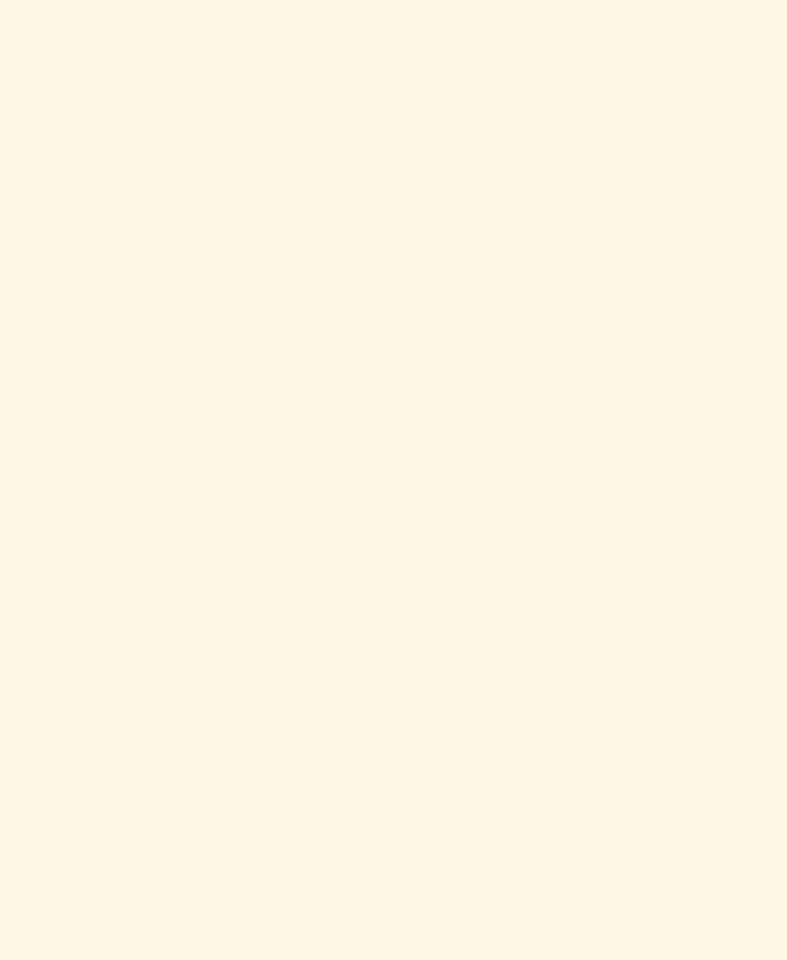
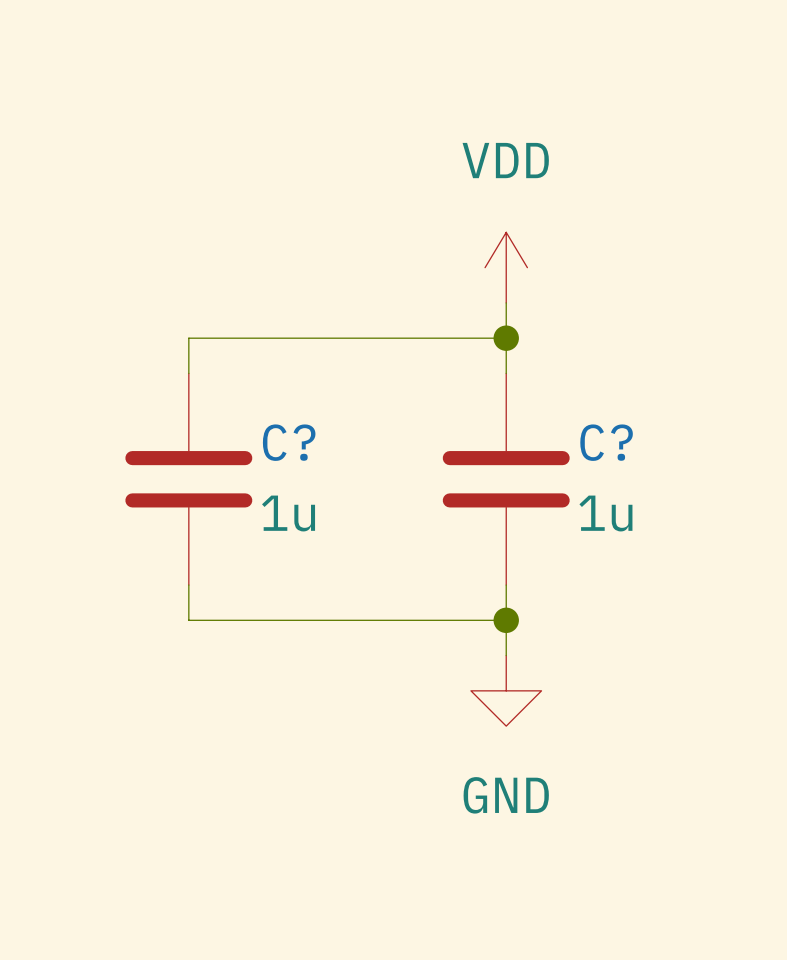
power symbol: none -> VDD (506, 267)
wire: none -> (506, 302) (506, 373)
wire: none -> (506, 338) (188, 338) (188, 373)
junction: none -> (506, 338)
C?: none -> 1u (188, 479)
C?: none -> 1u (506, 479)
wire: none -> (188, 585) (188, 620) (506, 620)
wire: none -> (506, 585) (506, 655)
junction: none -> (506, 620)
power symbol: none -> GND (506, 690)

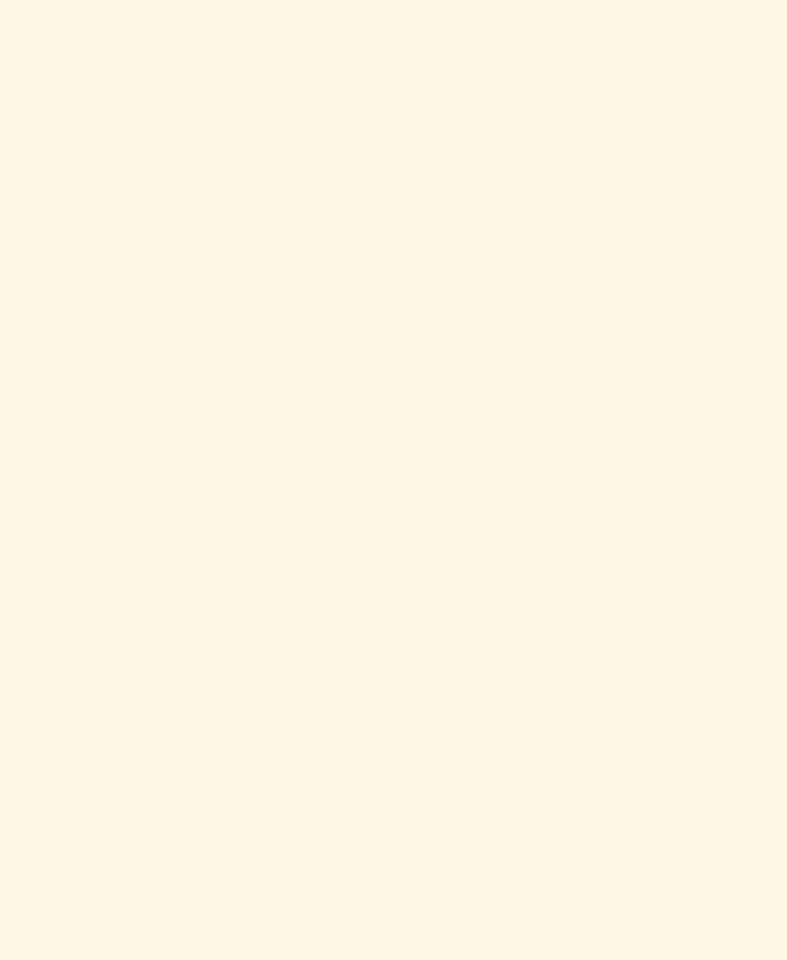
power symbol: VDD (506, 267) -> none
wire: (506, 302) (506, 373) -> none
wire: (506, 338) (188, 338) (188, 373) -> none
junction: (506, 338) -> none
C?: 1u (188, 479) -> none
C?: 1u (506, 479) -> none
wire: (188, 585) (188, 620) (506, 620) -> none
wire: (506, 585) (506, 655) -> none
junction: (506, 620) -> none
power symbol: GND (506, 690) -> none

